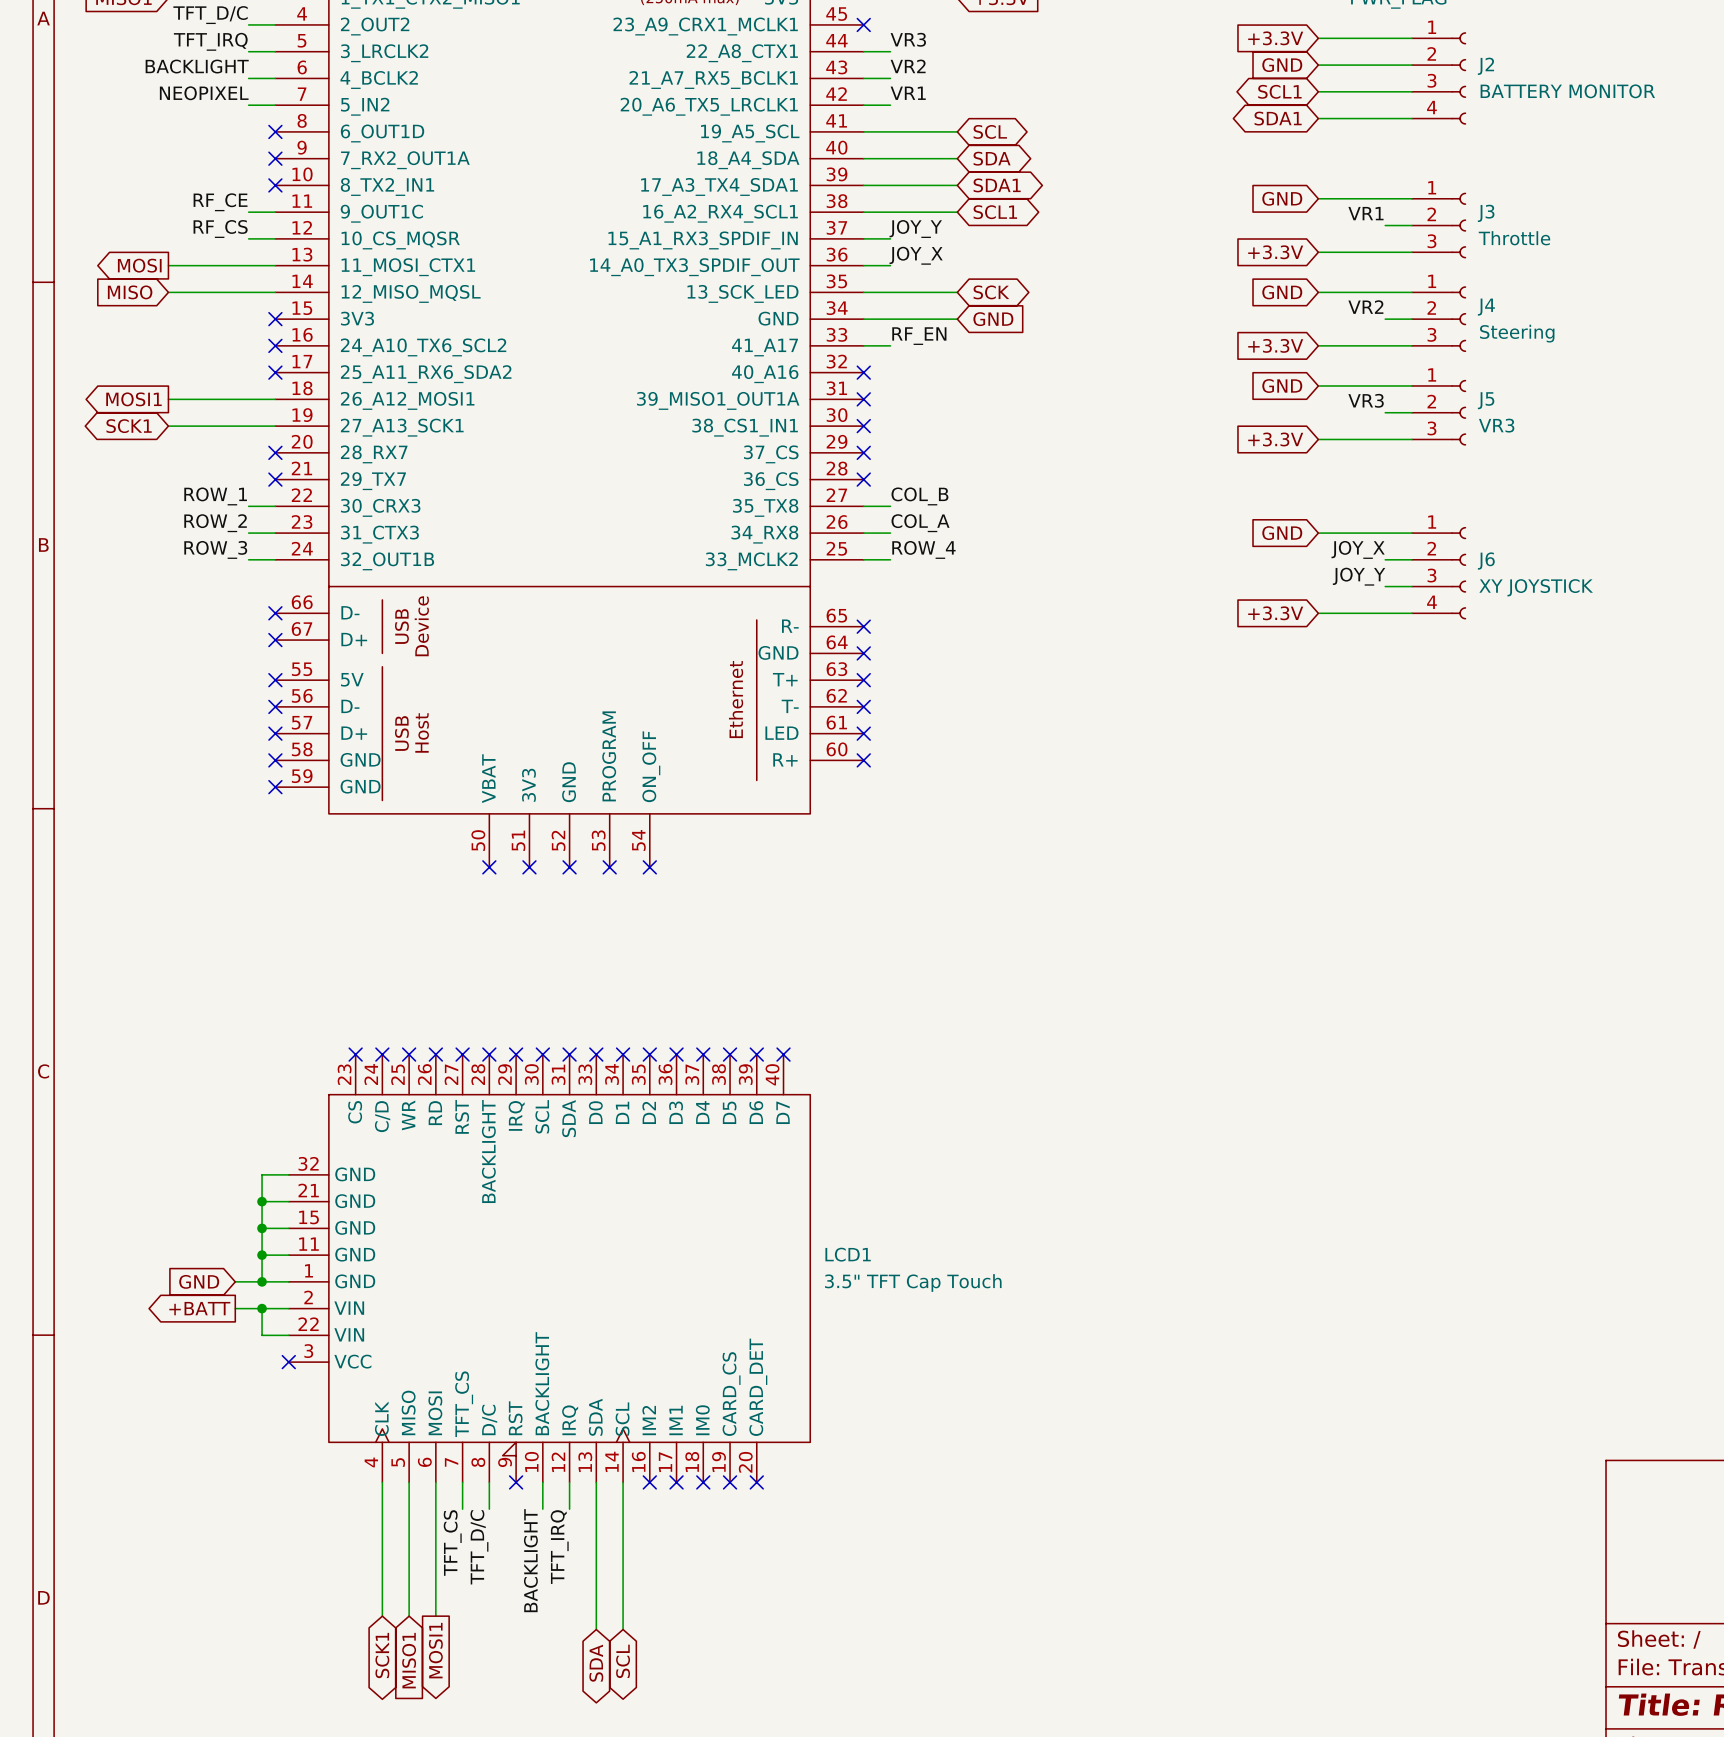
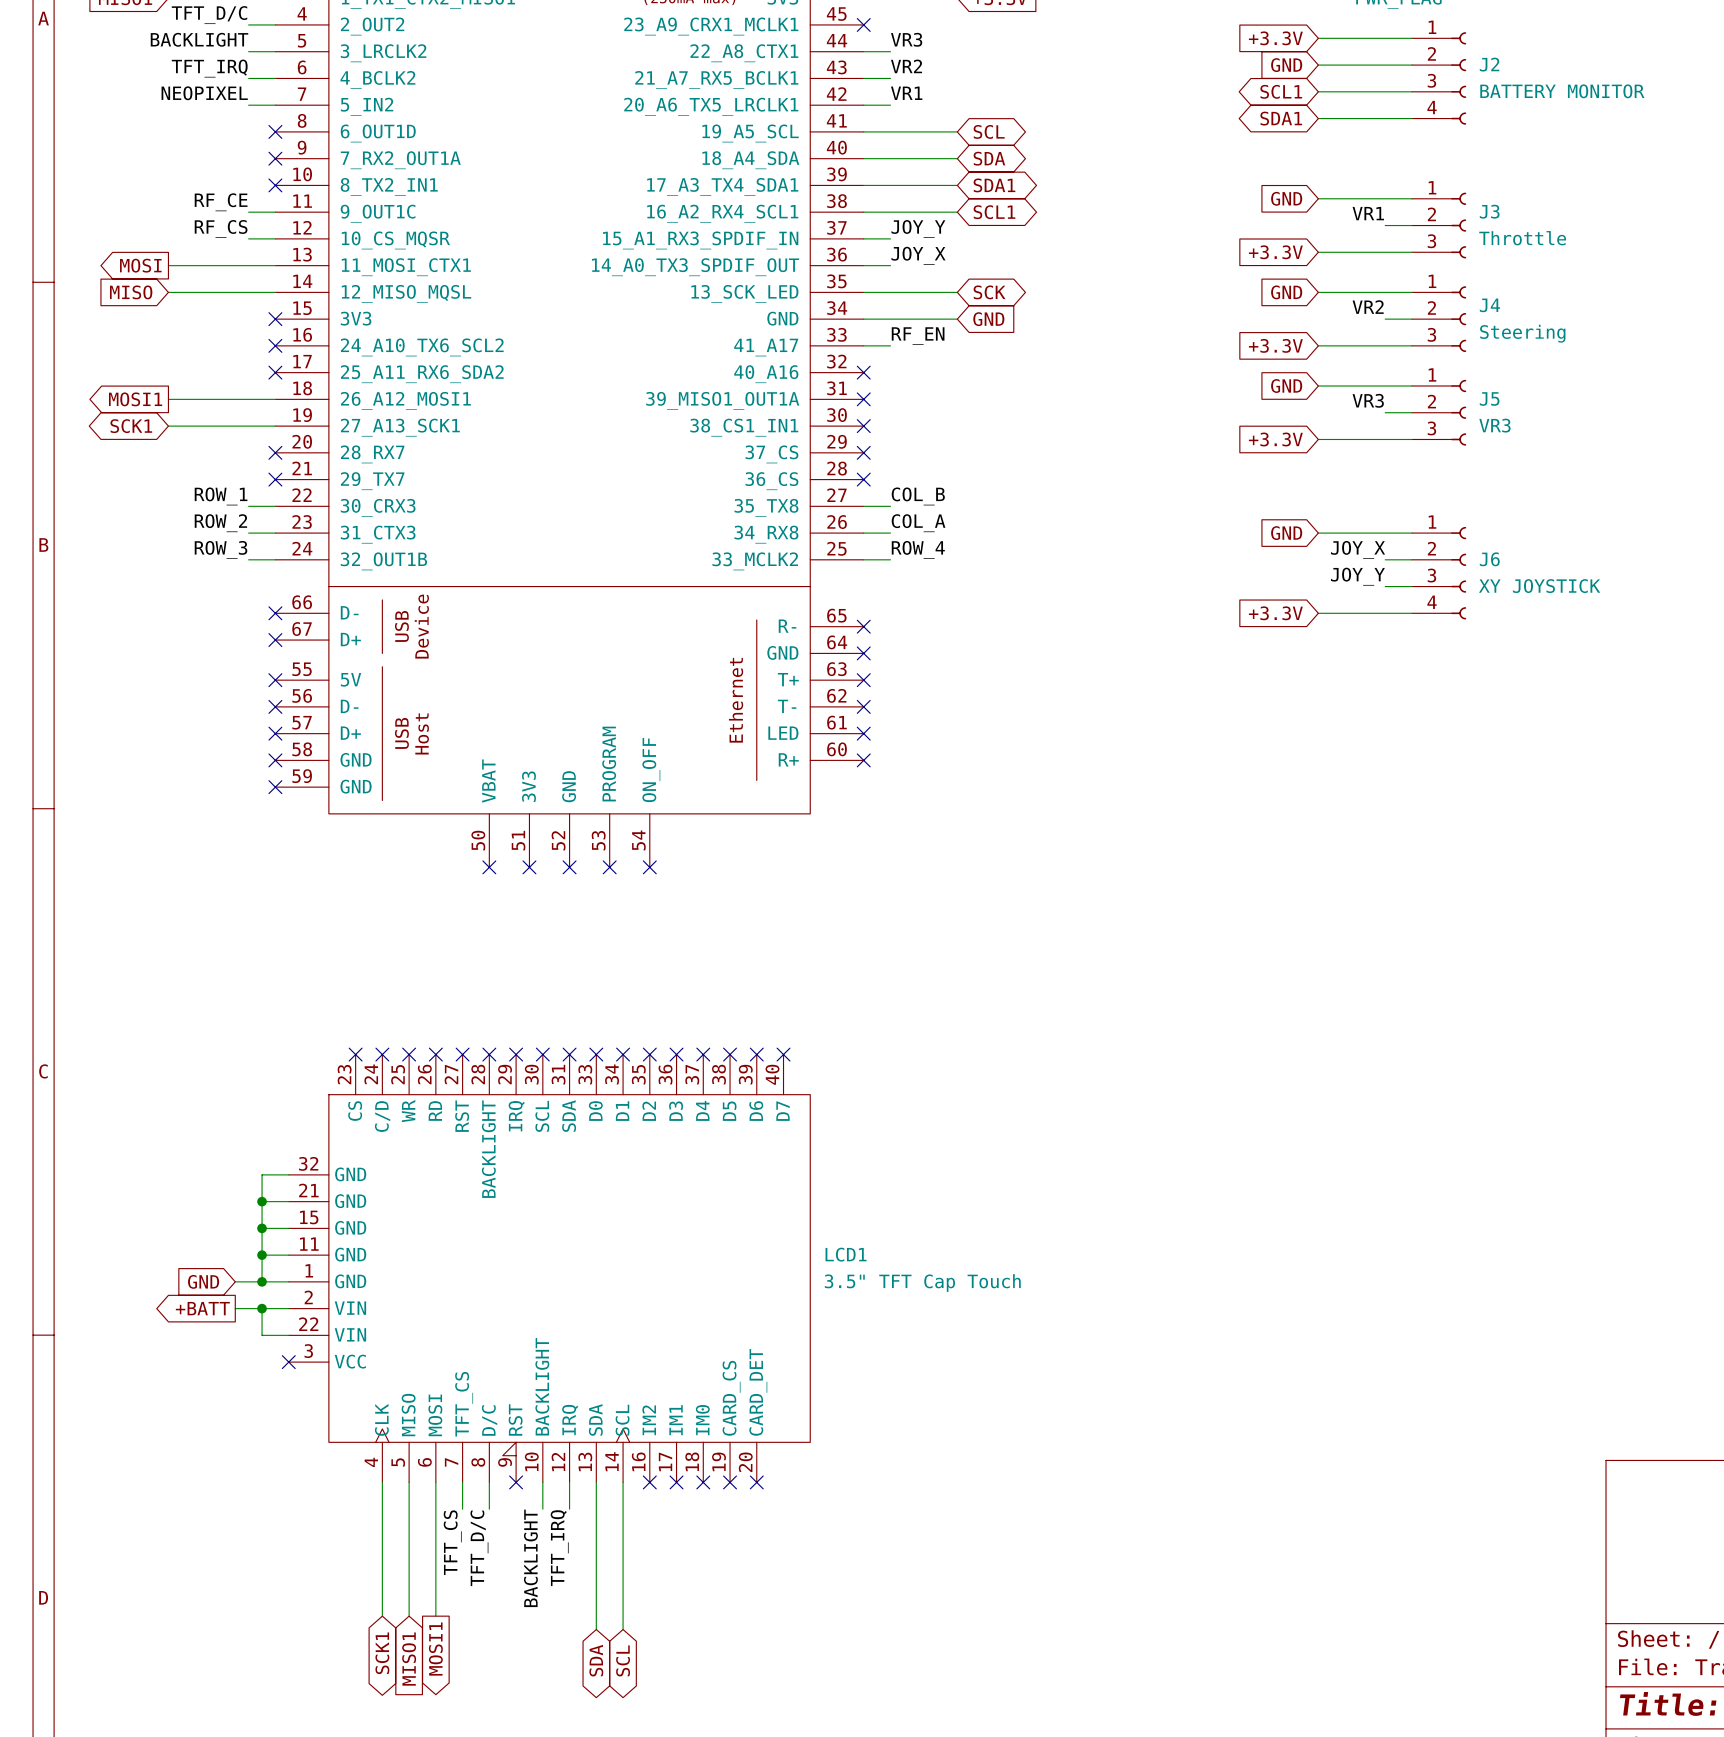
label: TFT_IRQ (210, 41) -> BACKLIGHT (199, 39)
label: BACKLIGHT (197, 66) -> TFT_IRQ (209, 68)

